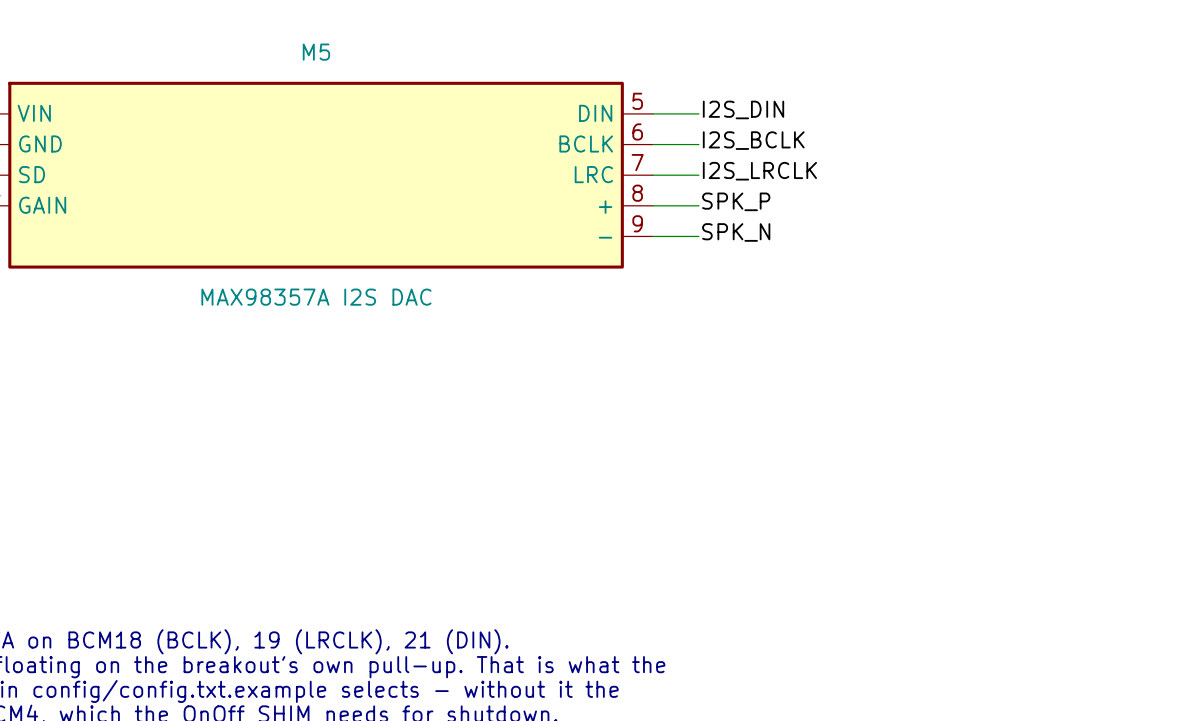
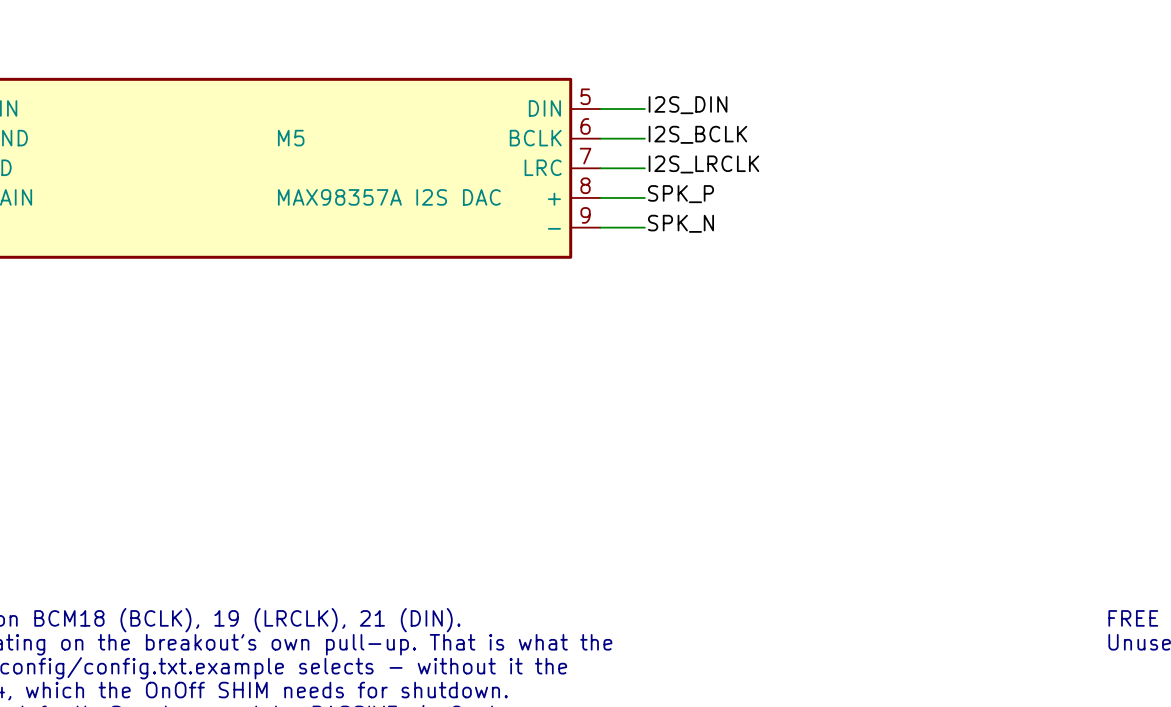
M5 name position: M5 (316, 52) -> M5 (291, 138)
M5 value position: MAX98357A I2S DAC (316, 297) -> MAX98357A I2S DAC (389, 197)

